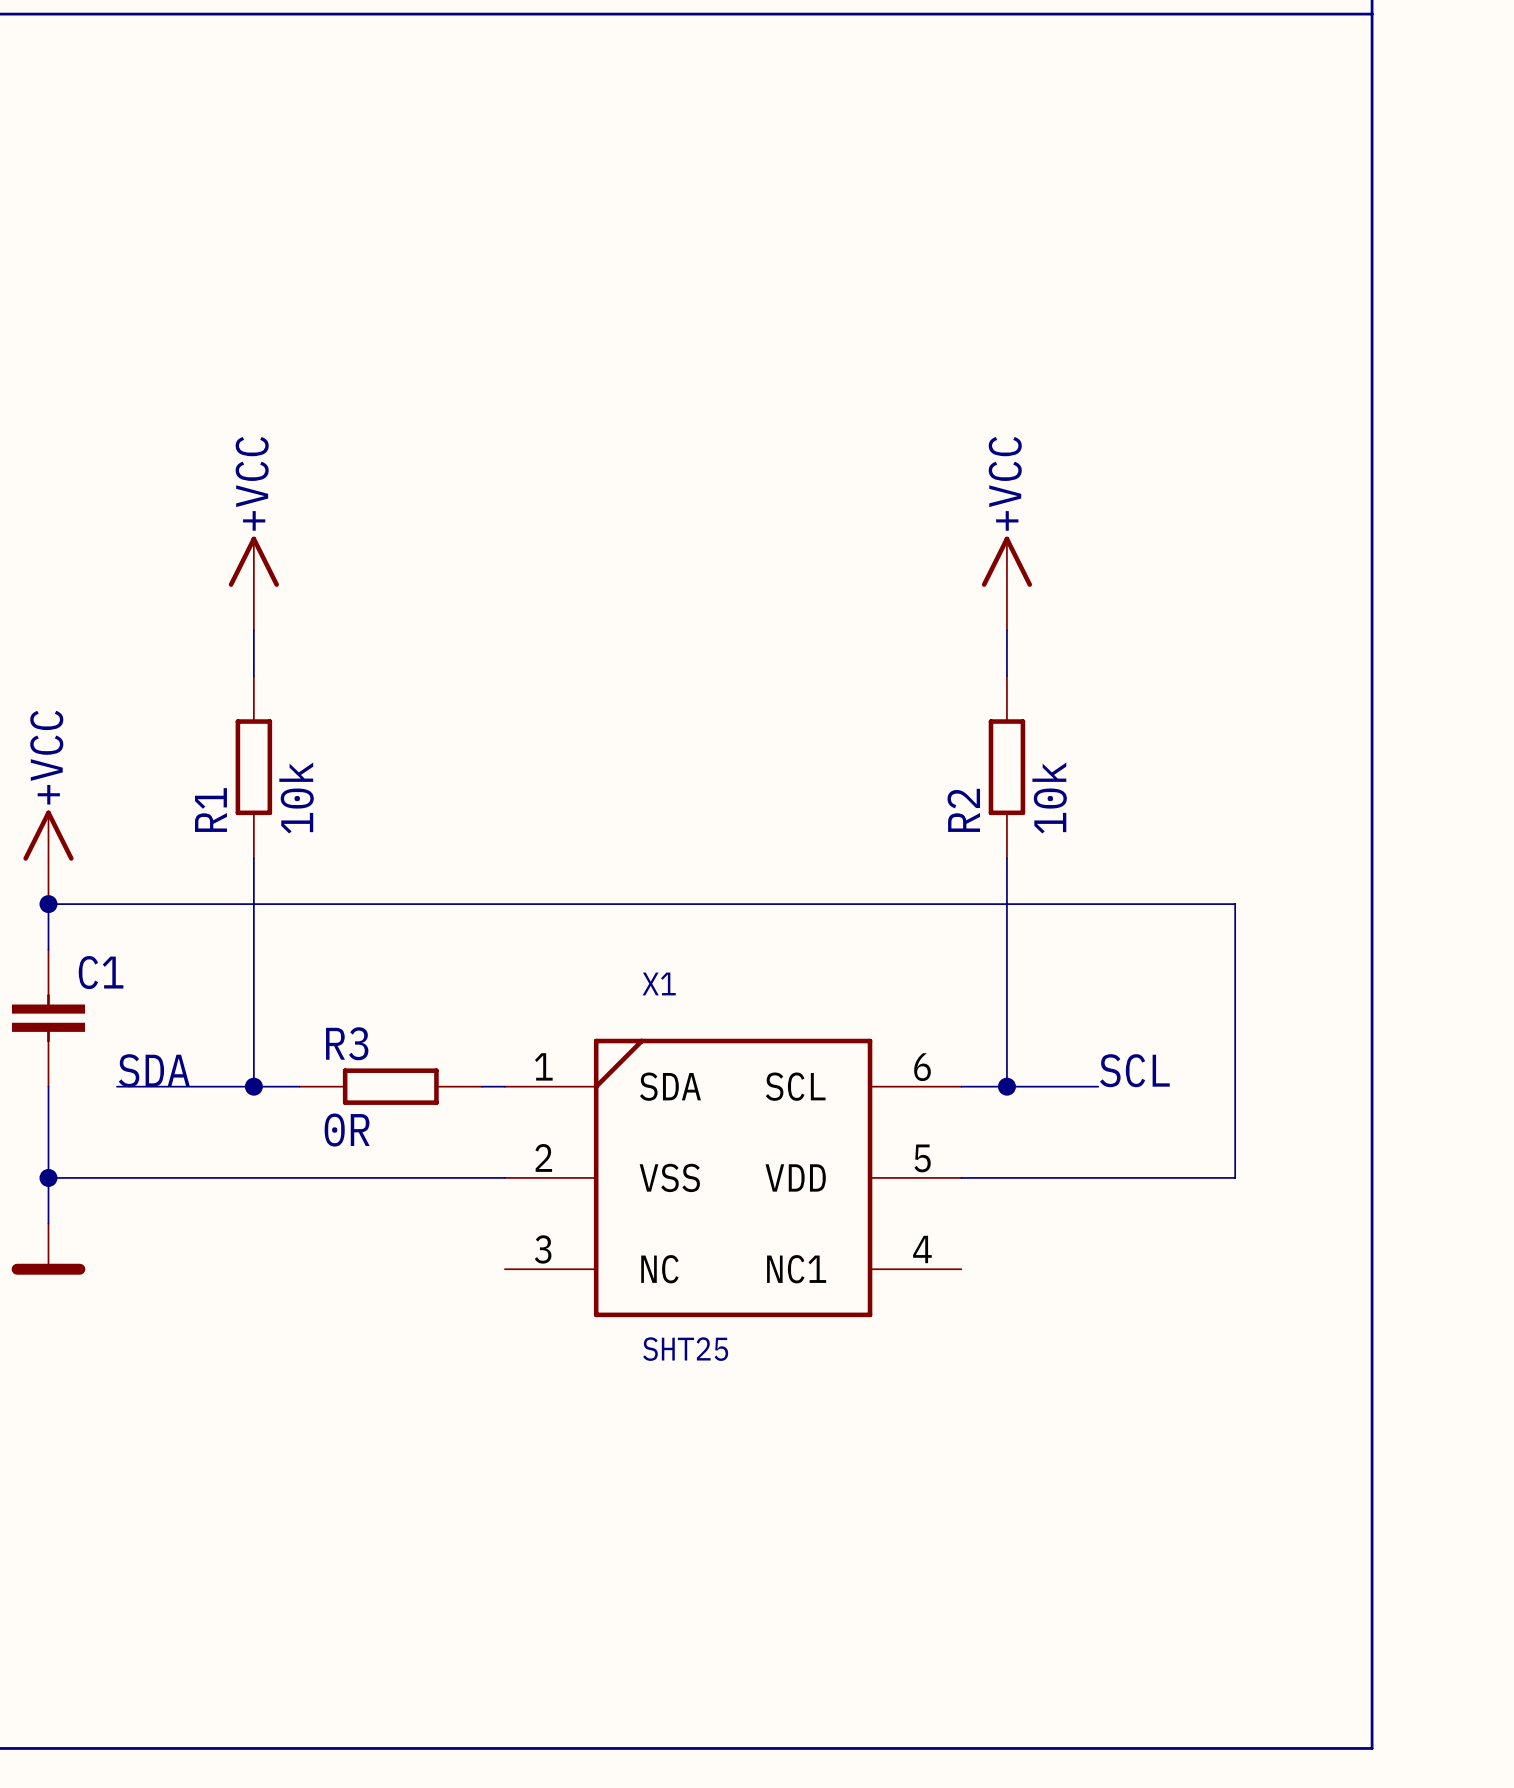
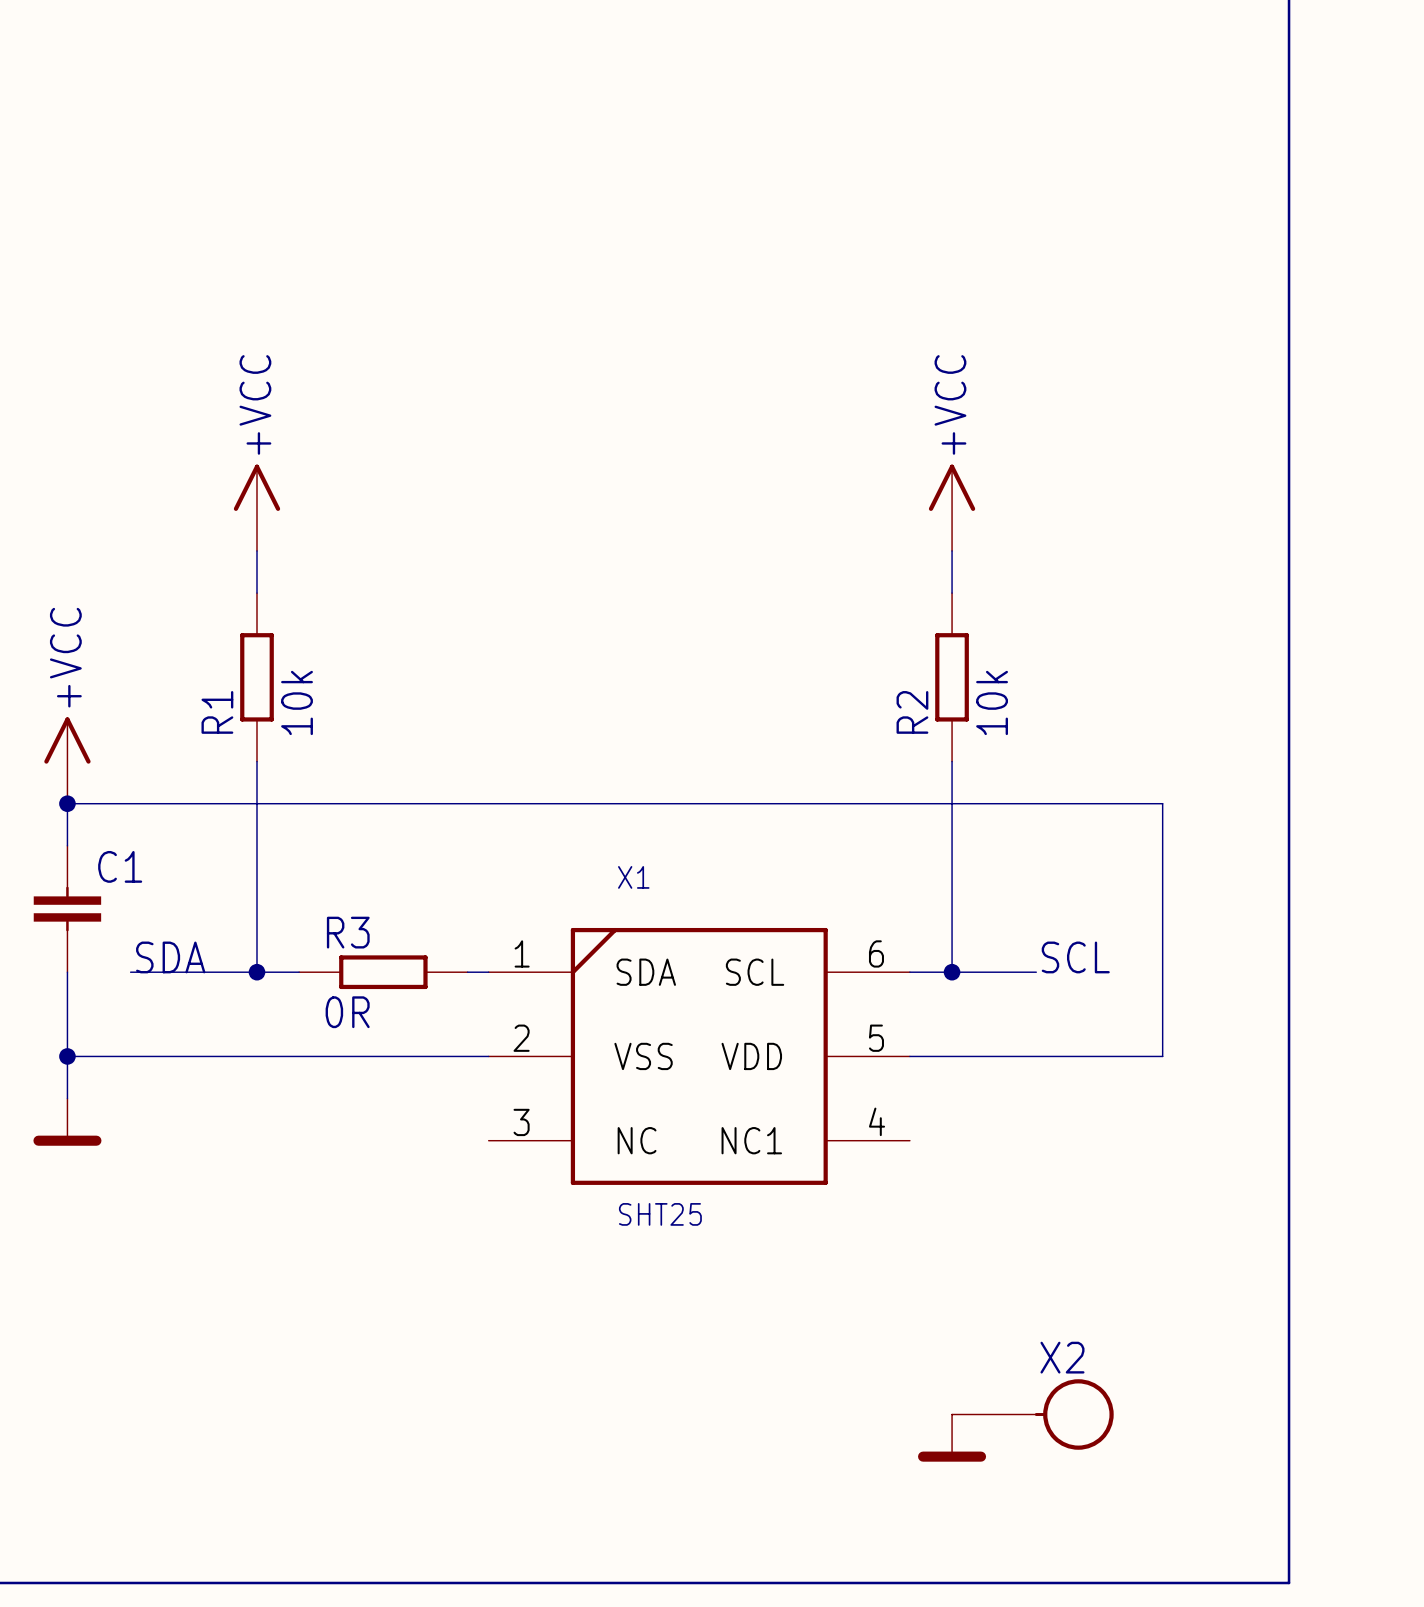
X2: none -> (1032, 1414)
power symbol: none -> (952, 1438)

